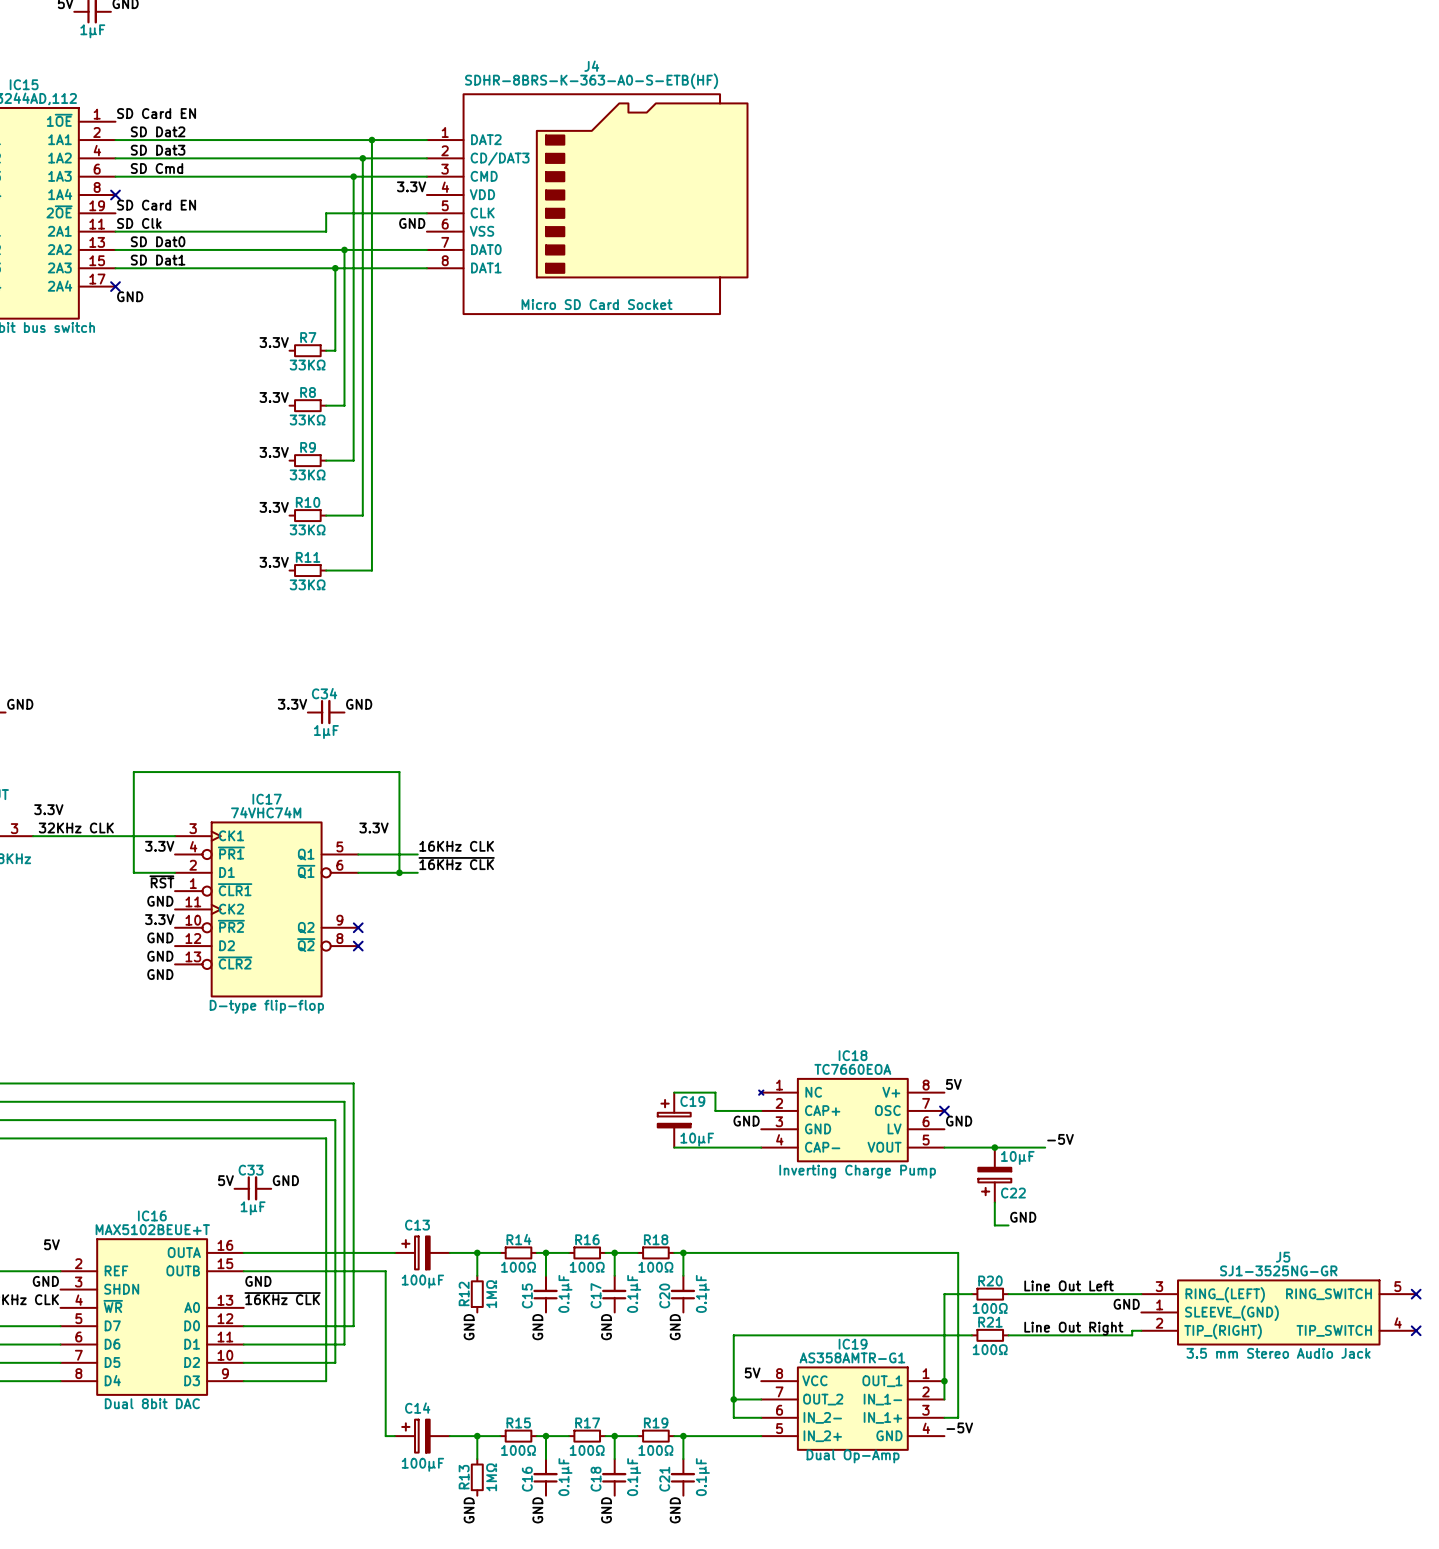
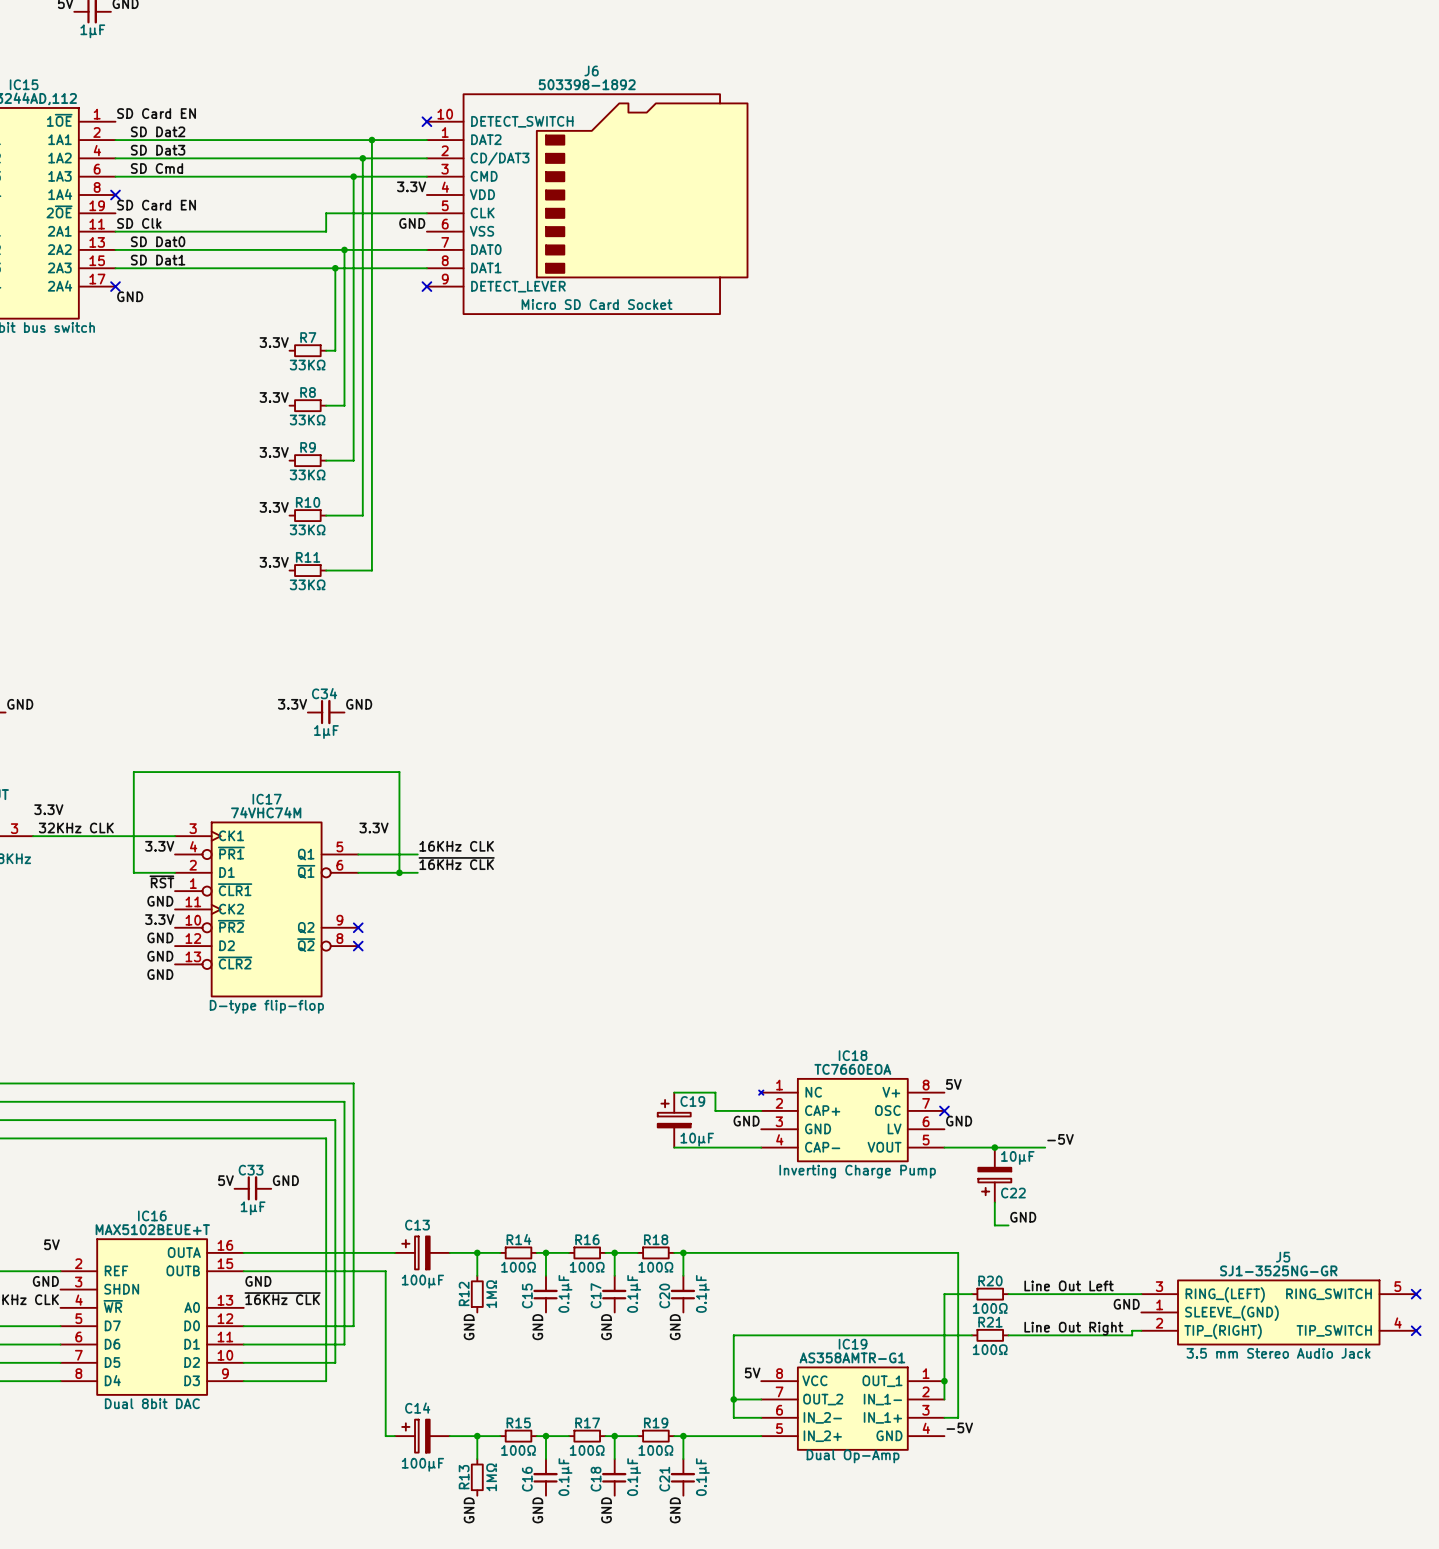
no-connect mark: none -> (426, 121)
J4: SDHR-8BRS-K-363-A0-S-ETB(HF) (587, 204) -> none
J6: none -> 503398-1892 (587, 204)
no-connect mark: none -> (426, 286)

